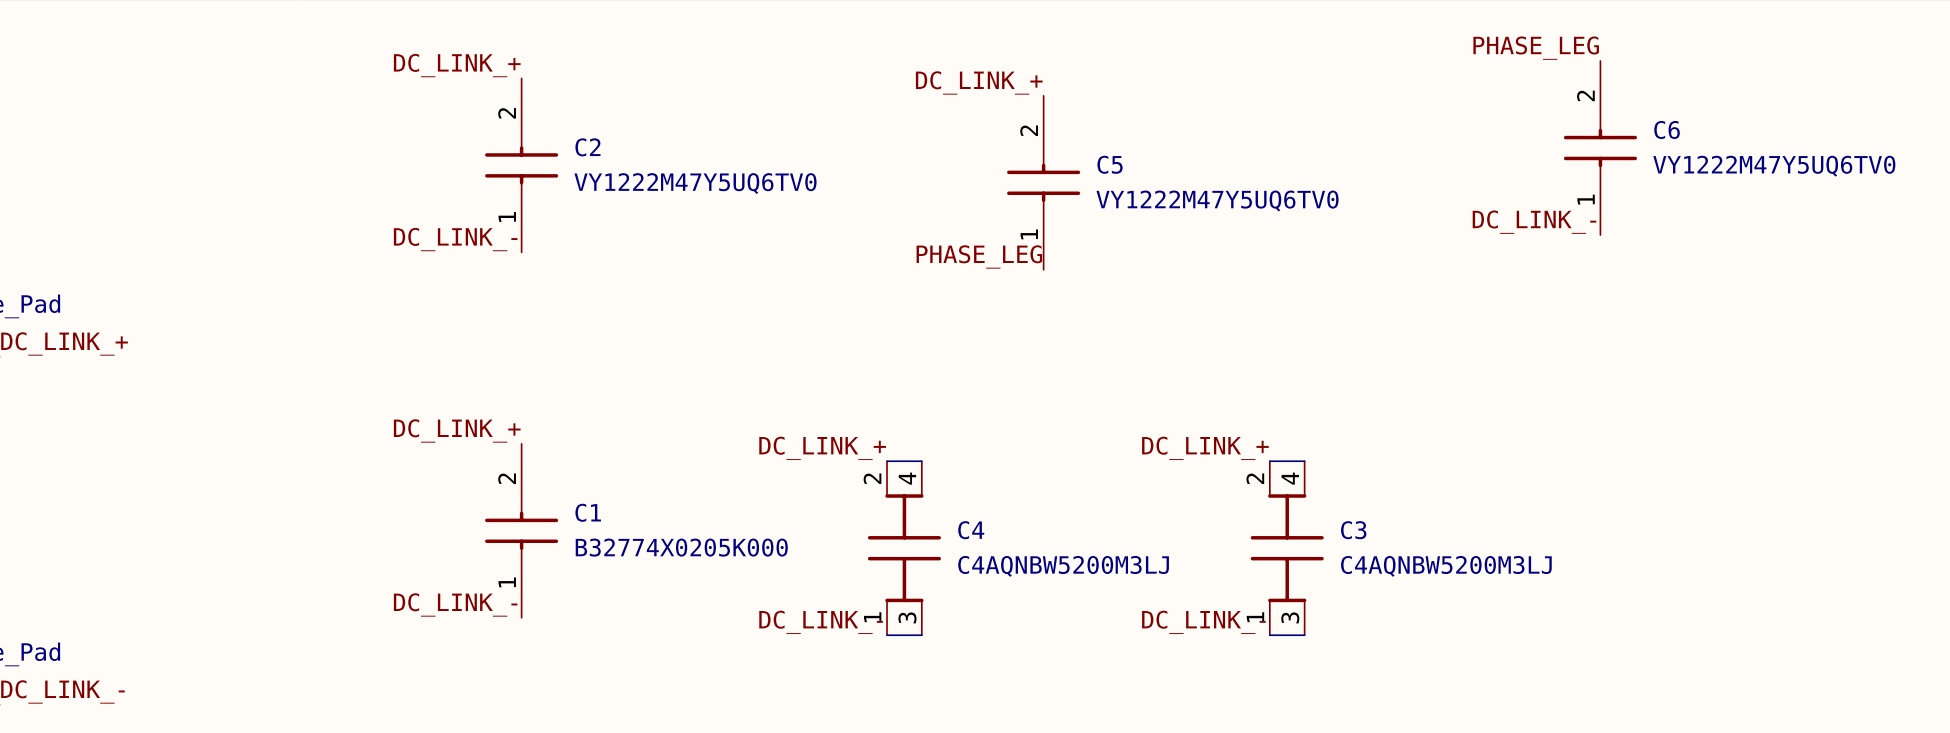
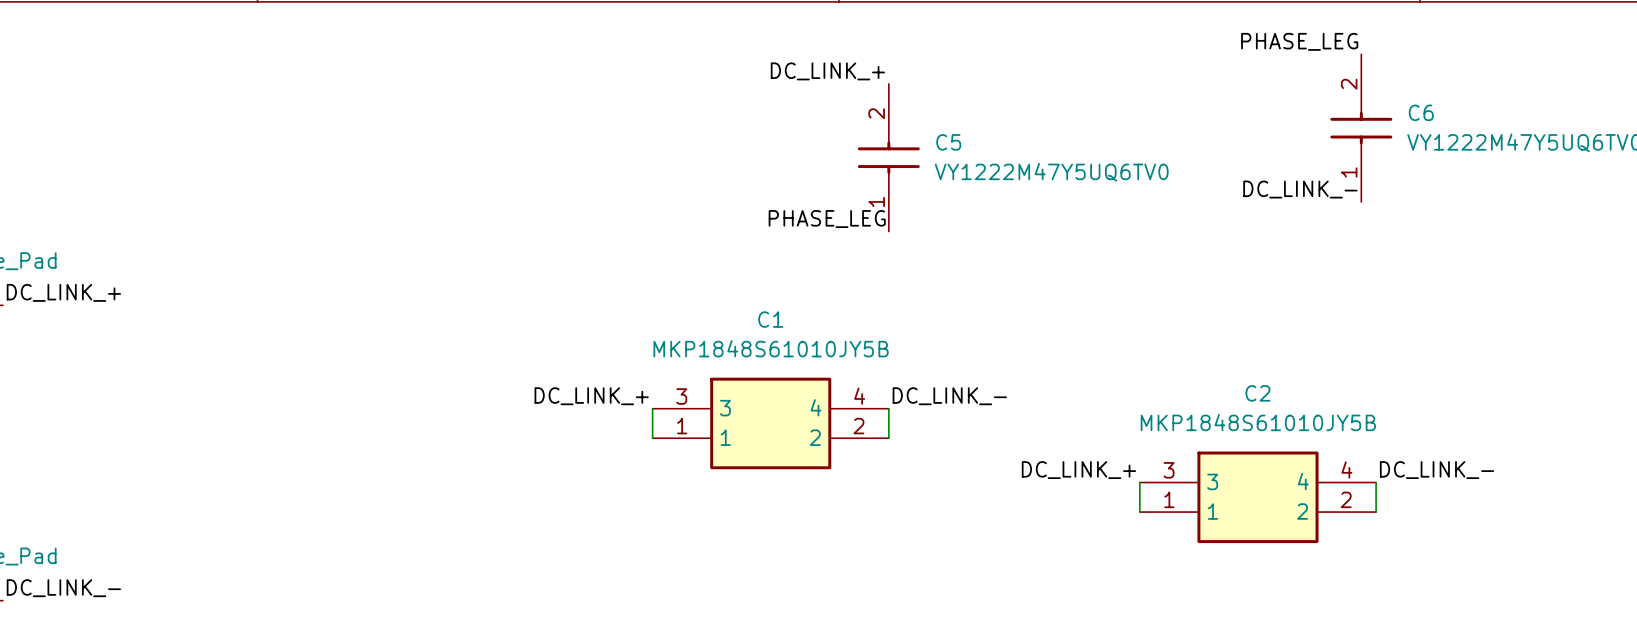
label: DC_LINK_+ (457, 65) -> none
C2 symbol: [485, 78, 559, 253] -> [1139, 451, 1377, 544]
C2 name position: C2 (587, 147) -> C2 (1257, 393)
C2 value: VY1222M47Y5UQ6TV0 (695, 183) -> MKP1848S61010JY5B (1258, 422)
label: DC_LINK_- (455, 239) -> none
label: DC_LINK_+ (457, 430) -> none
C1 symbol: [485, 443, 559, 618] -> [652, 377, 889, 470]
label position: DC_LINK_+ (822, 448) -> DC_LINK_+ (591, 396)
label position: DC_LINK_+ (1205, 448) -> DC_LINK_+ (1078, 470)
wire: (1269, 461) (1304, 461) -> none
label: none -> DC_LINK_- (949, 396)
wire: none -> (652, 408) (652, 438)
wire: none -> (888, 408) (888, 438)
C1 name position: C1 (588, 512) -> C1 (770, 319)
C1 value: B32774X0205K000 (681, 547) -> MKP1848S61010JY5B (771, 348)
C4: C4AQNBW5200M3LJ (904, 548) -> none
C3: C4AQNBW5200M3LJ (1287, 548) -> none
label: none -> DC_LINK_- (1437, 470)
wire: none -> (1139, 482) (1139, 512)
wire: none -> (1376, 482) (1376, 512)
label: DC_LINK_- (455, 604) -> none
label: DC_LINK_- (821, 622) -> none
label: DC_LINK_- (1203, 622) -> none
wire: (887, 635) (921, 635) -> none
wire: (1269, 635) (1304, 635) -> none

